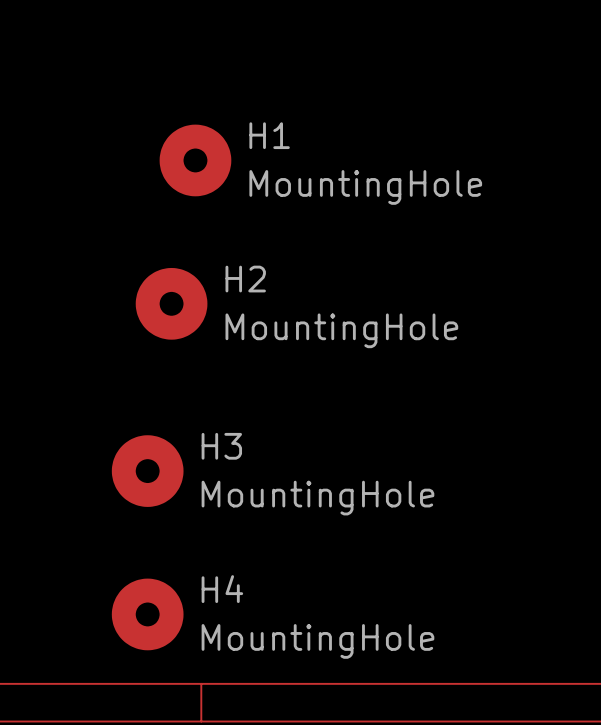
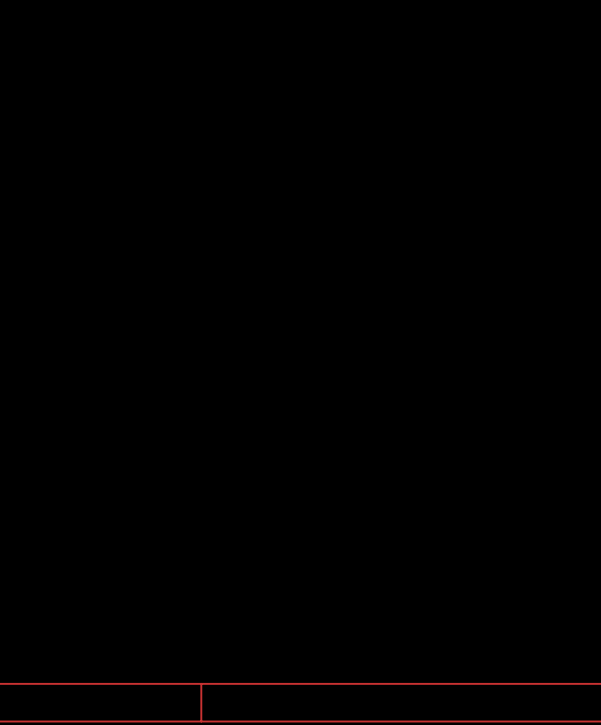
H1: MountingHole (195, 160) -> none
H2: MountingHole (171, 303) -> none
H3: MountingHole (147, 471) -> none
H4: MountingHole (147, 614) -> none

